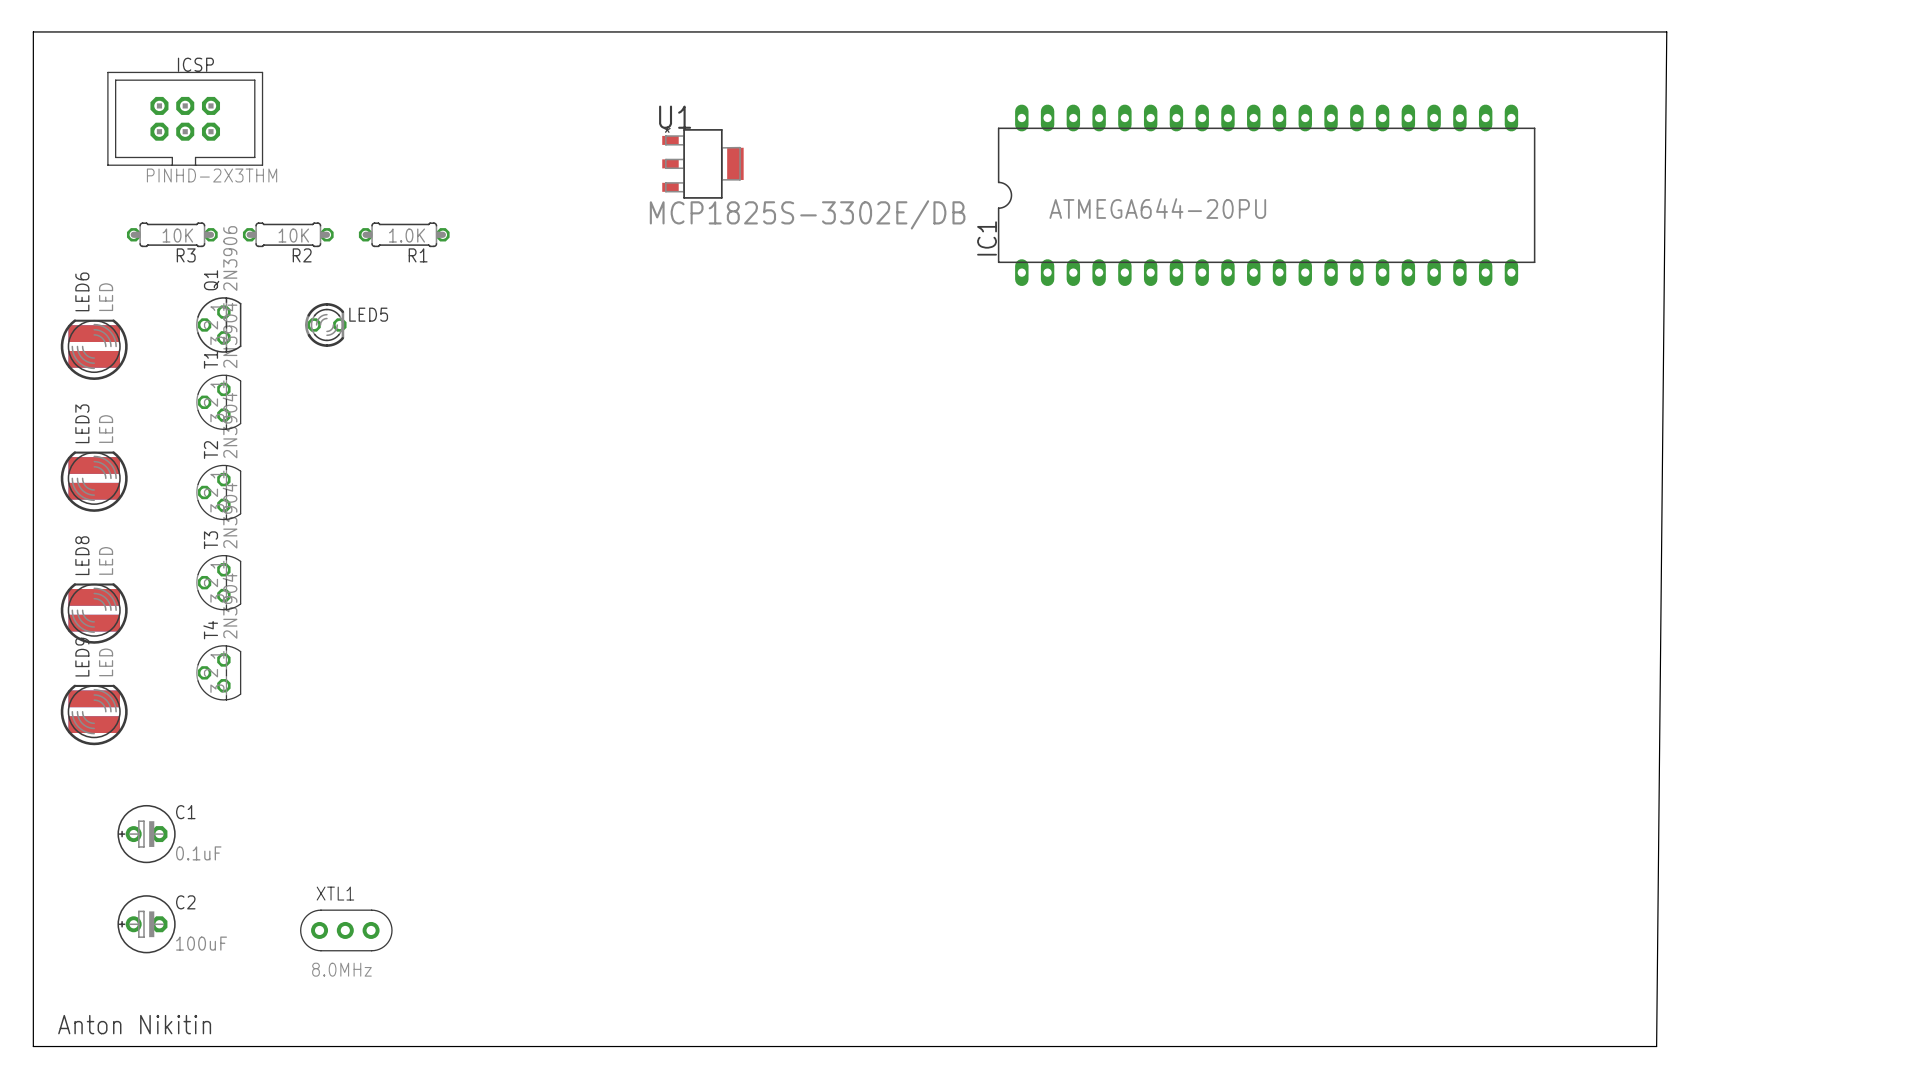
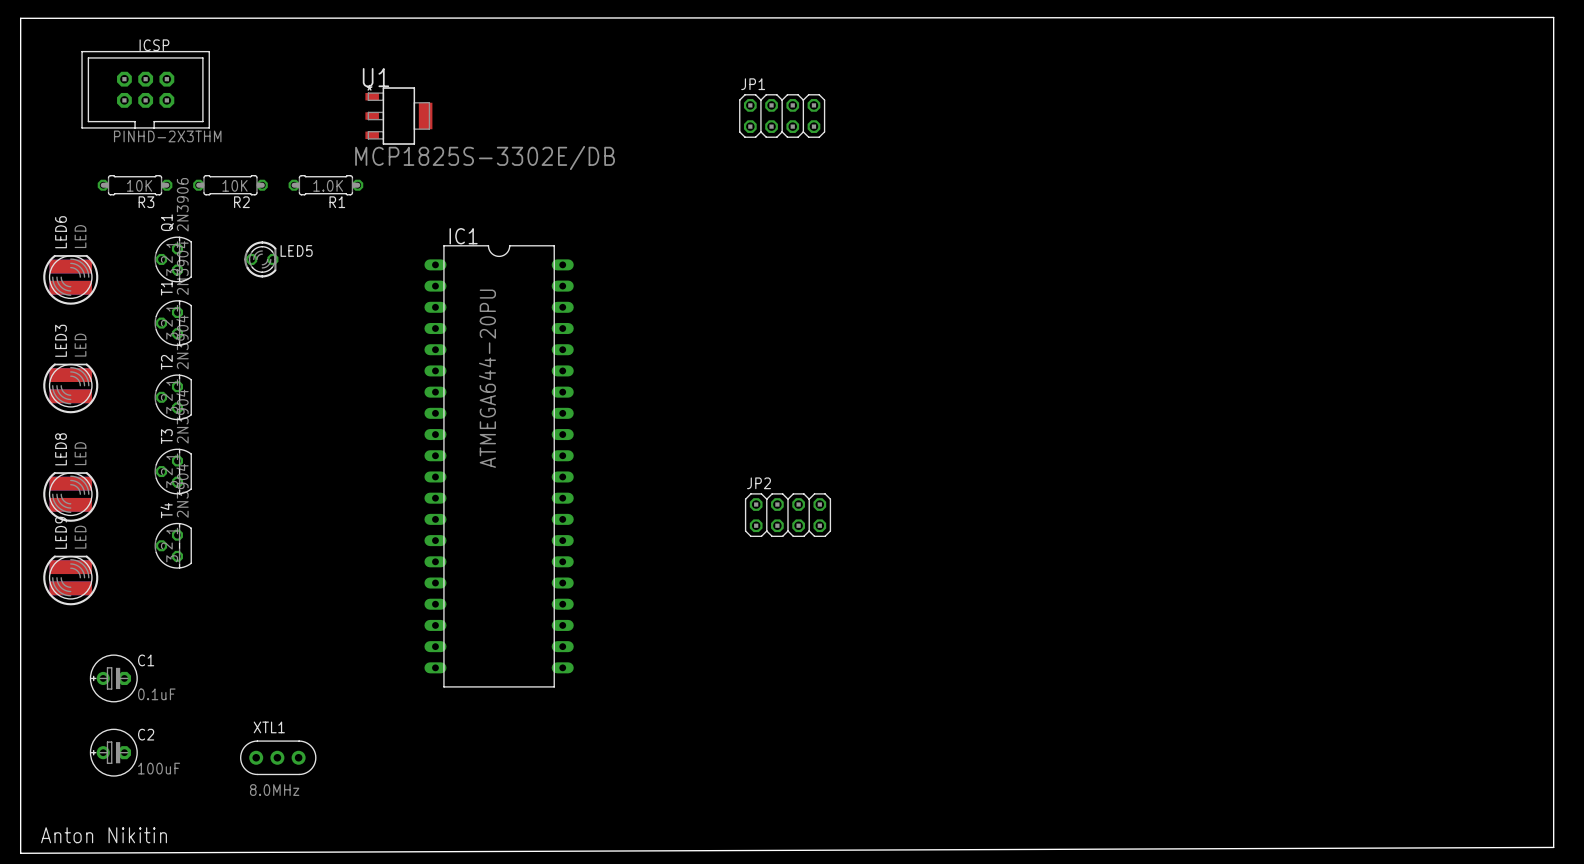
board edge: (33, 31) (1666, 31) (1656, 1046) (33, 1046) -> (20, 18) (1553, 17) (1553, 847) (20, 853)
JP1: none -> (782, 116)
U1 position: (702, 163) -> (398, 116)
IC1 rotation: 0° (1266, 195) -> 90° clockwise (499, 466)
IC1 position: (1266, 195) -> (499, 466)
JP2: none -> (788, 515)

